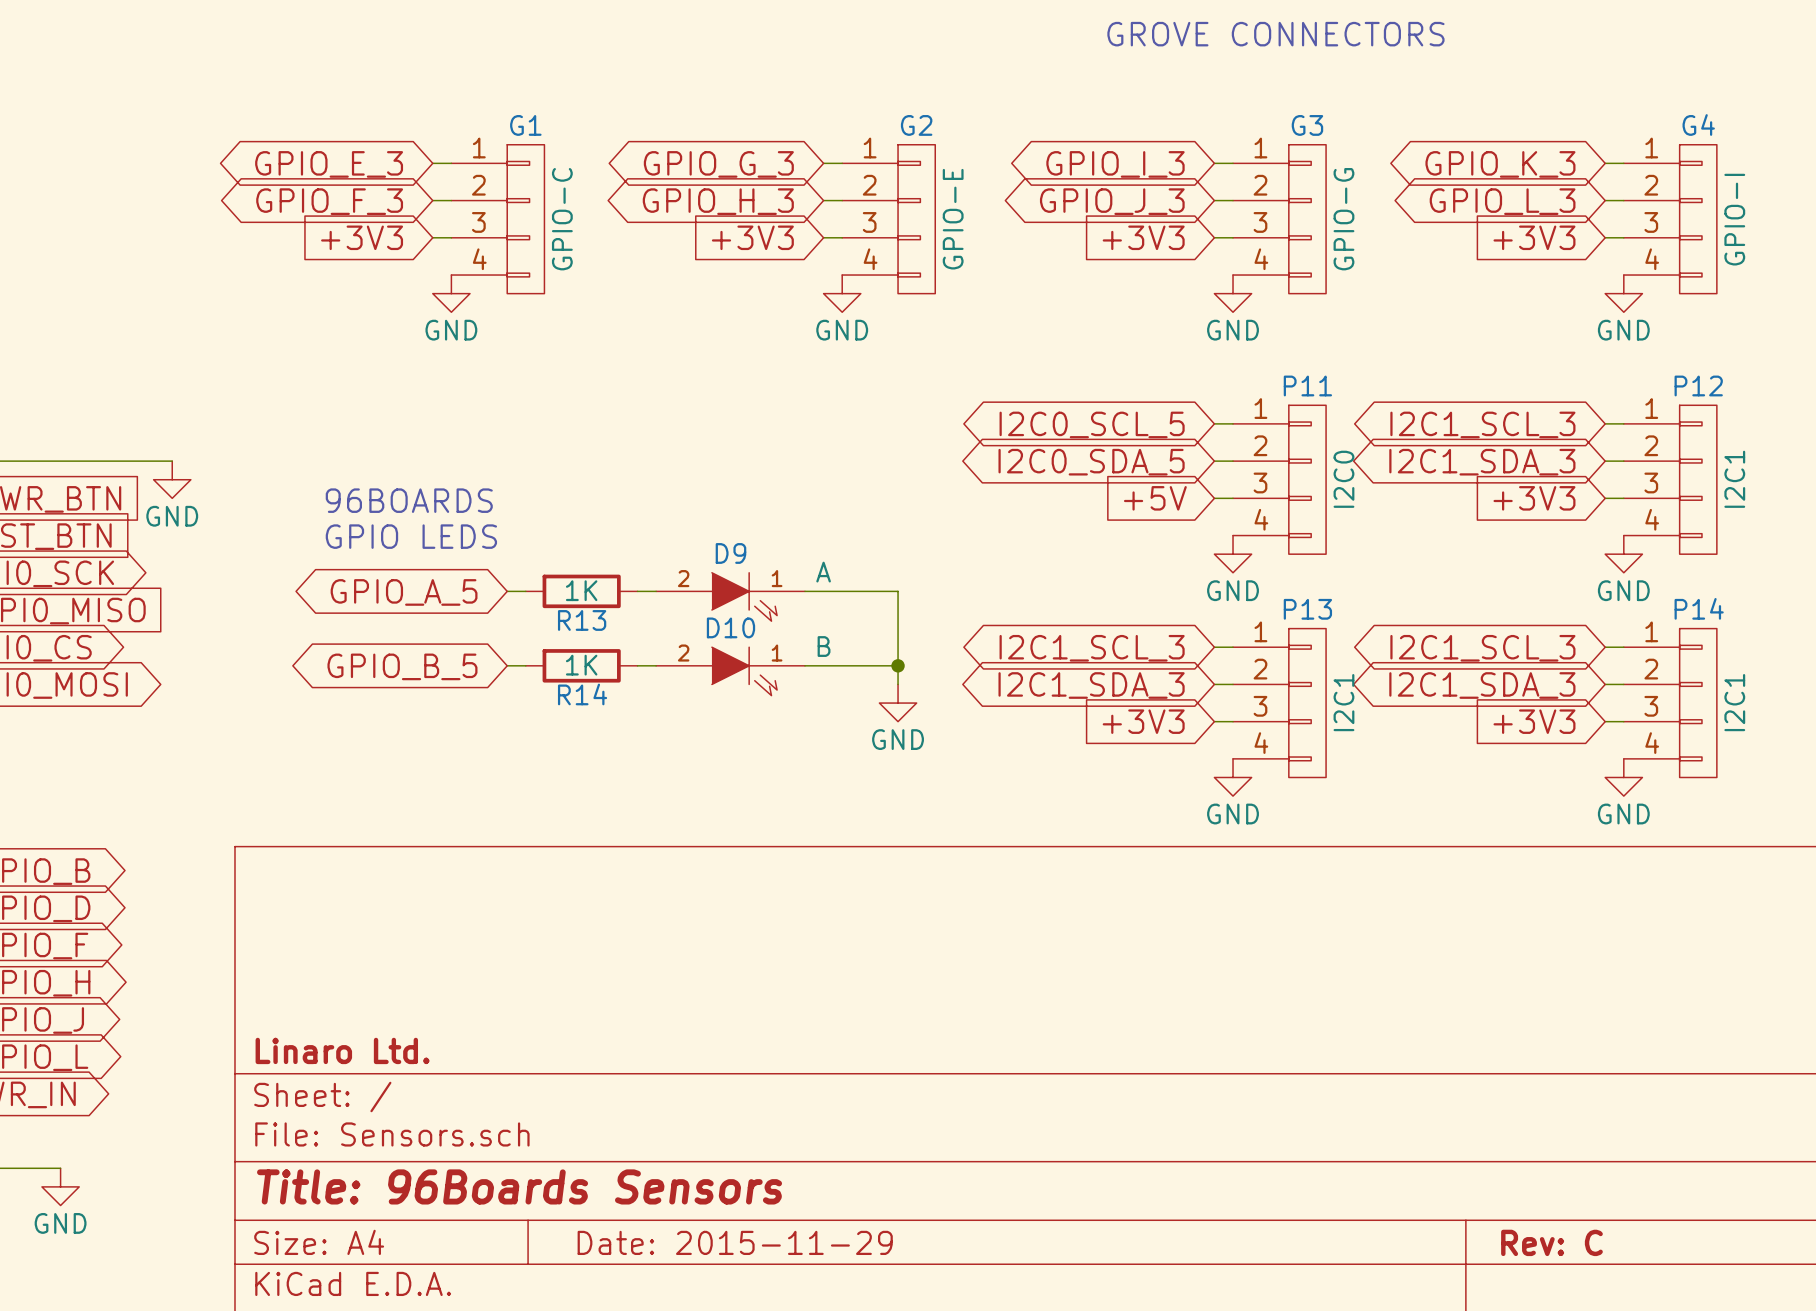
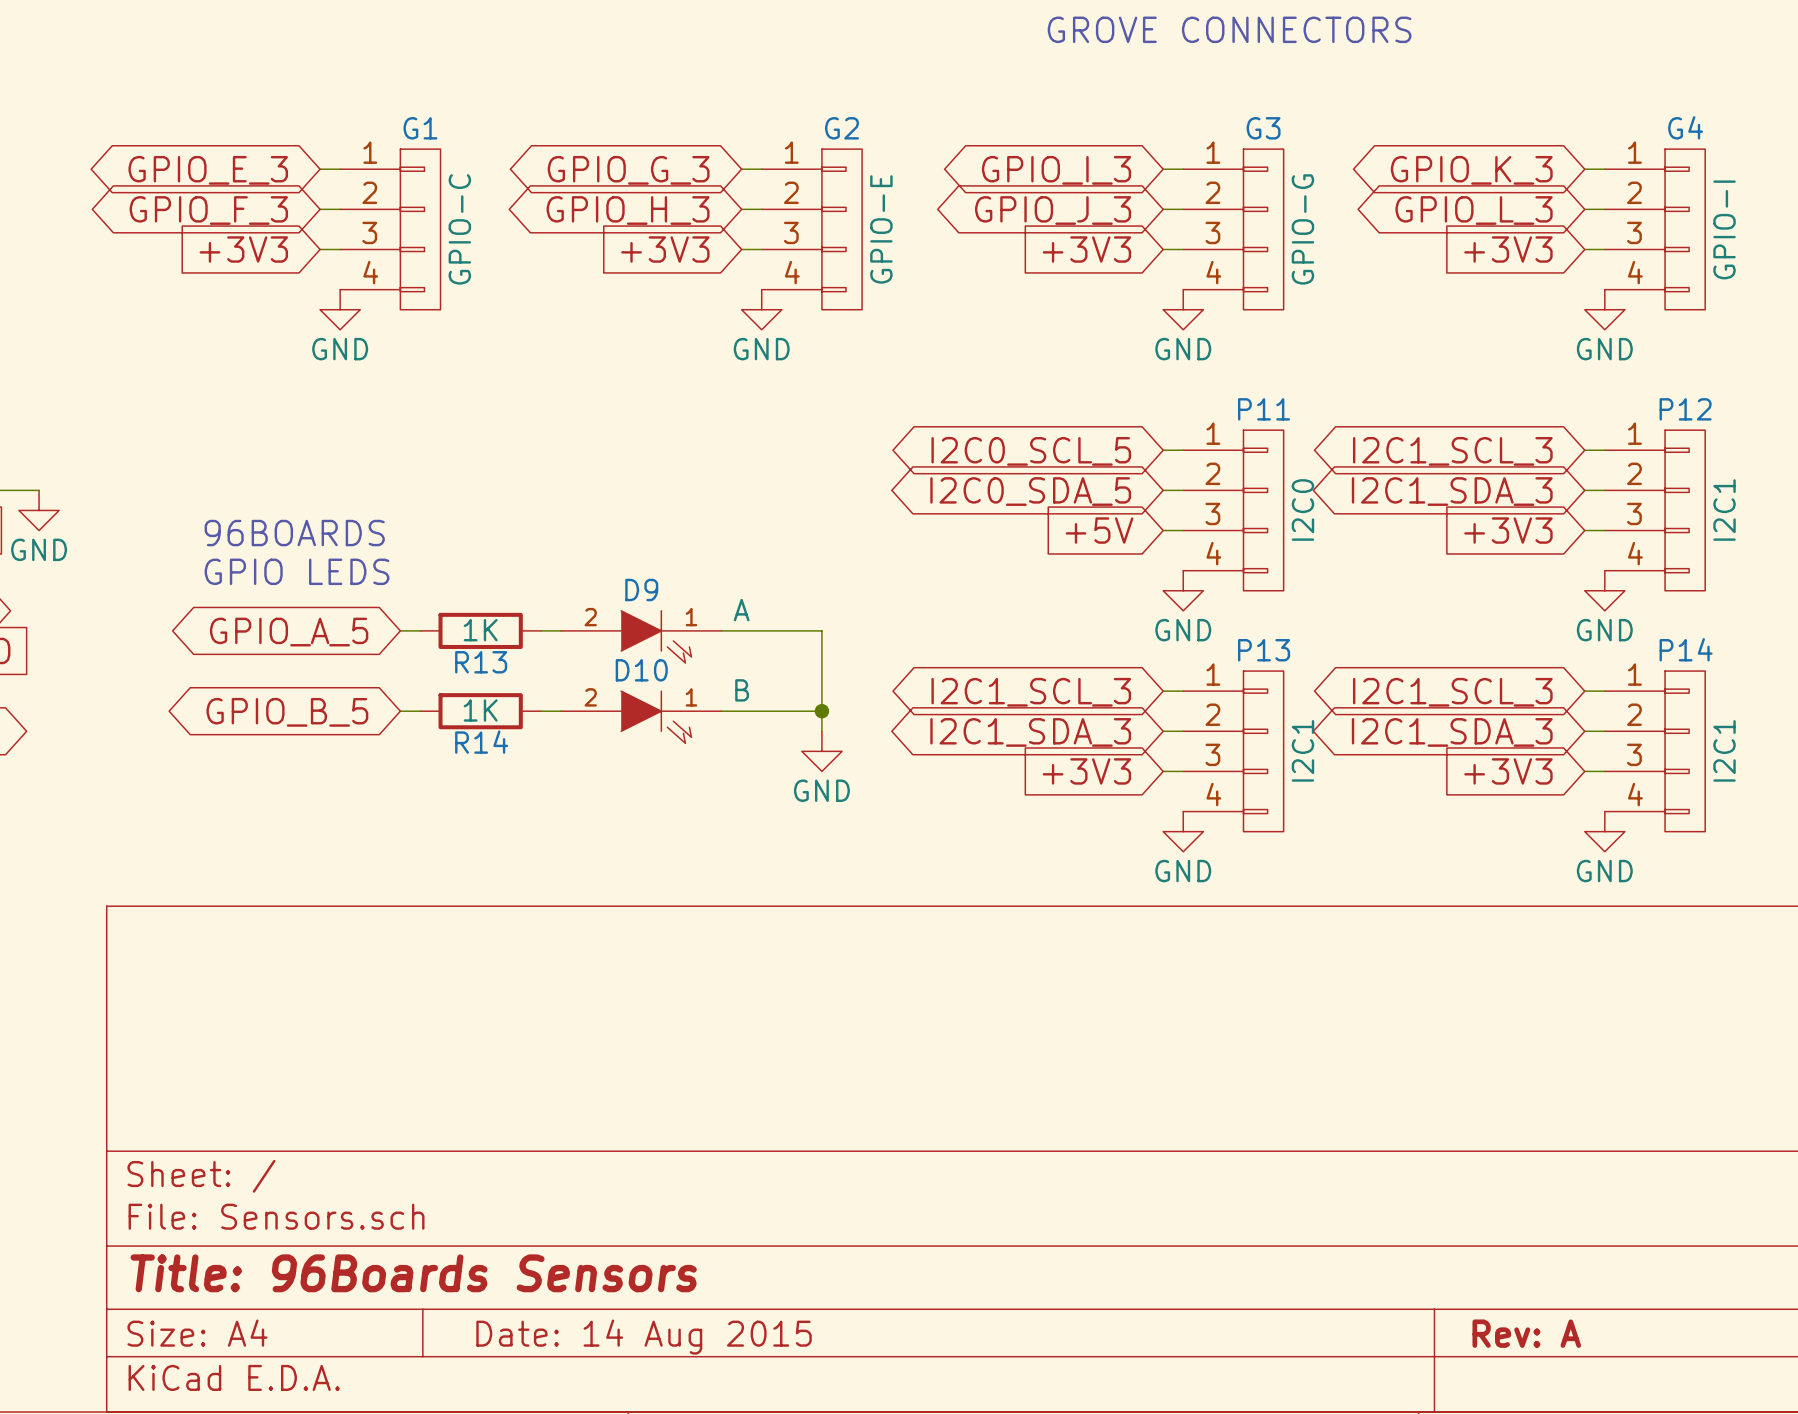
title block: Linaro Ltd. (342, 1050) -> none
title block: Date: 2015-11-29 (735, 1242) -> Date: 14 Aug 2015 (644, 1337)
title block: Rev: C (1551, 1242) -> Rev: A (1526, 1333)

